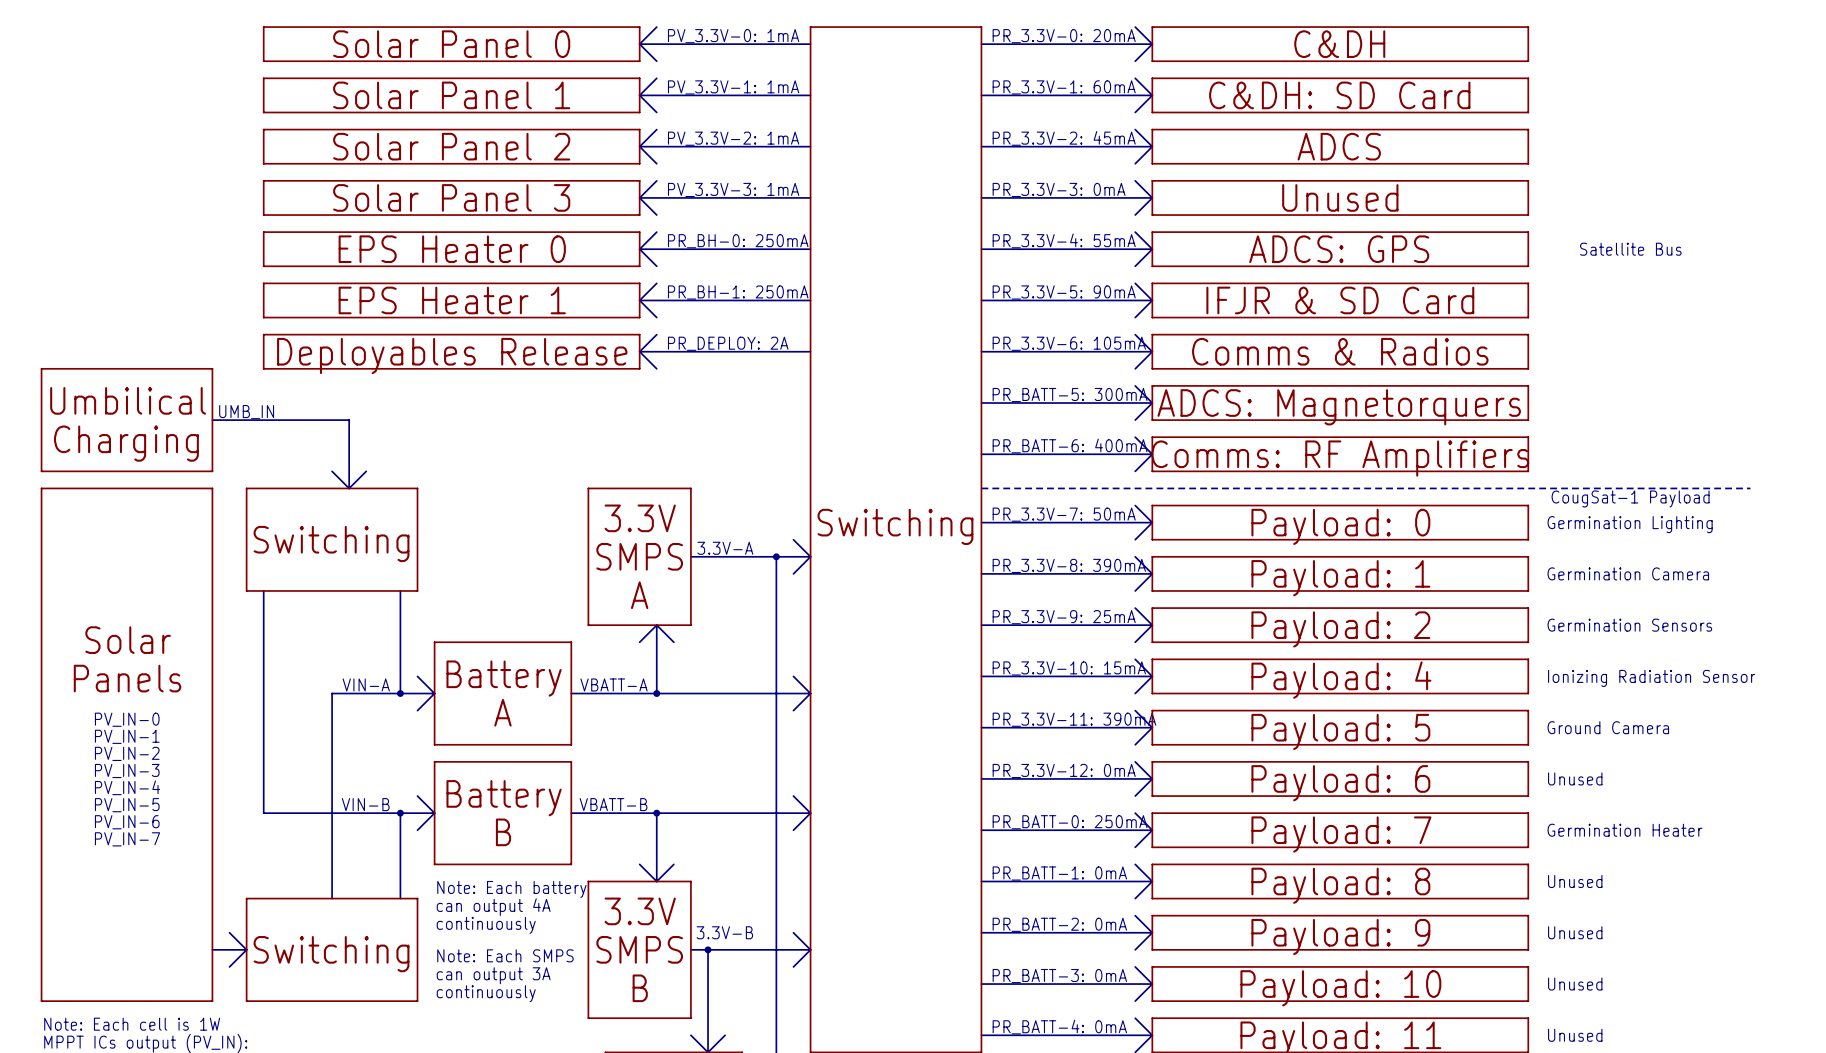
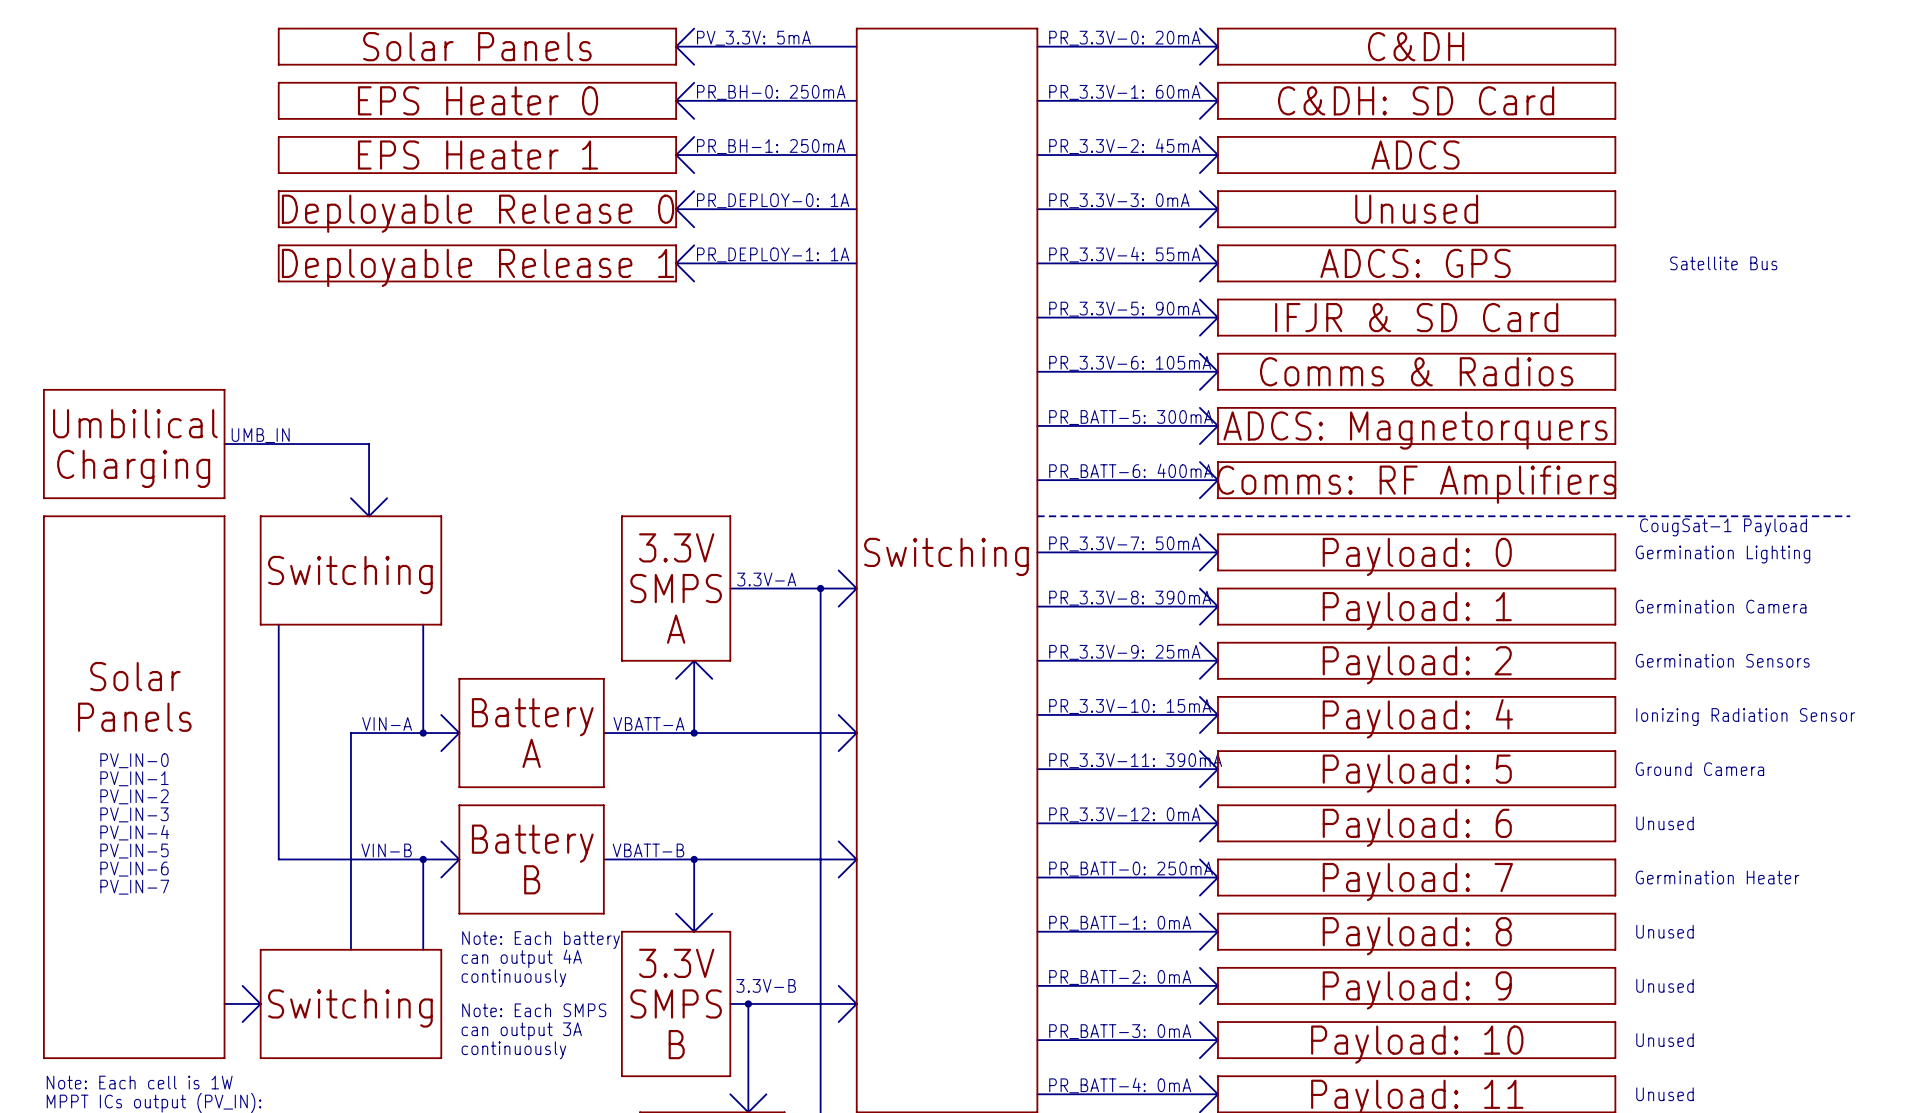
text: PV_3.3V-0: 1mA (733, 36) -> PV_3.3V: 5mA (753, 38)
text: Solar Panel 0 (451, 44) -> Solar Panels (477, 46)
text: PV_3.3V-1: 1mA (733, 87) -> none
text: Solar Panel 1 (451, 95) -> EPS Heater 0 (478, 100)
text: PV_3.3V-2: 1mA (733, 138) -> none
text: Solar Panel 2 (451, 146) -> EPS Heater 1 (478, 155)
text: none -> PR_DEPLOY-0: 1A (773, 200)
text: PV_3.3V-3: 1mA (733, 189) -> none
text: Solar Panel 3 (451, 197) -> Deployable Release 0 (478, 213)
text: none -> PR_DEPLOY-1: 1A (773, 254)
text position: PR_BH-0: 250mA (738, 241) -> PR_BH-0: 250mA (771, 92)
text: EPS Heater 0 (452, 249) -> Deployable Release 1 (478, 267)
line: (263, 283) (639, 283) (639, 317) (263, 317) (263, 283) -> none
line: (656, 283) (639, 300) -> none
text position: PR_BH-1: 250mA (738, 292) -> PR_BH-1: 250mA (771, 146)
text: EPS Heater 1 (452, 300) -> none
line: (639, 300) (810, 300) -> none
line: (639, 300) (656, 317) -> none
line: (263, 334) (263, 368) (639, 368) (639, 334) (263, 334) -> none
line: (656, 334) (639, 351) -> none
text: PR_DEPLOY: 2A (728, 343) -> none
line: (639, 351) (810, 351) -> none
line: (639, 351) (656, 368) -> none
text: Deployables Release (452, 356) -> none

